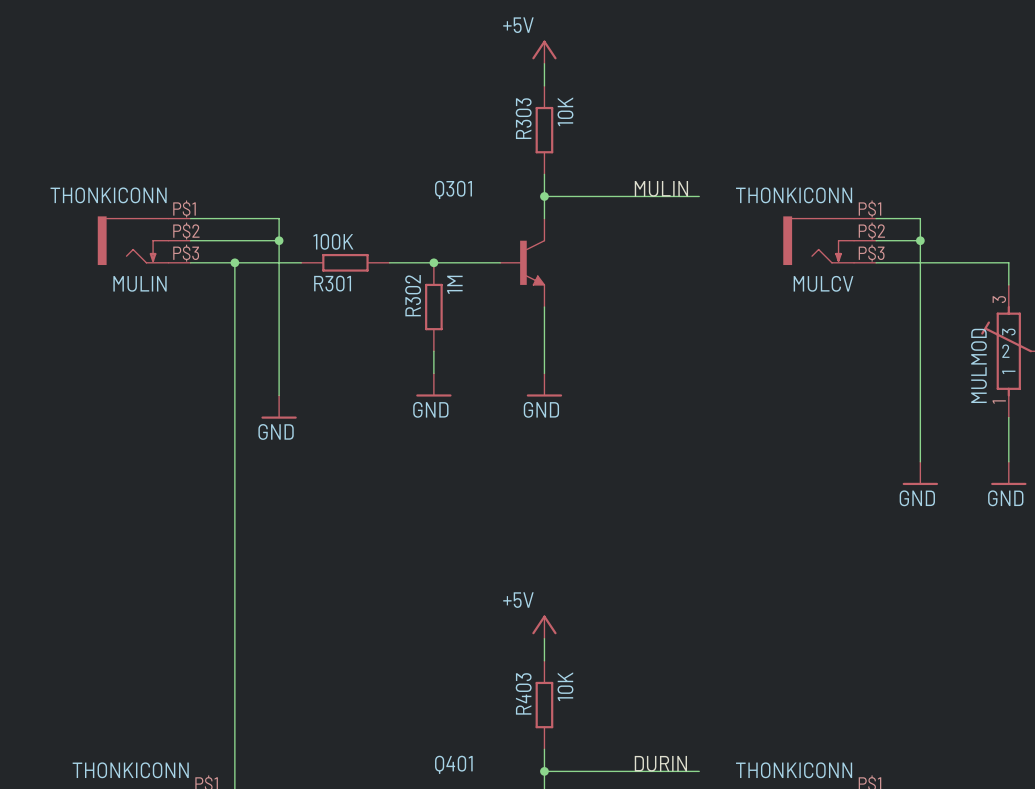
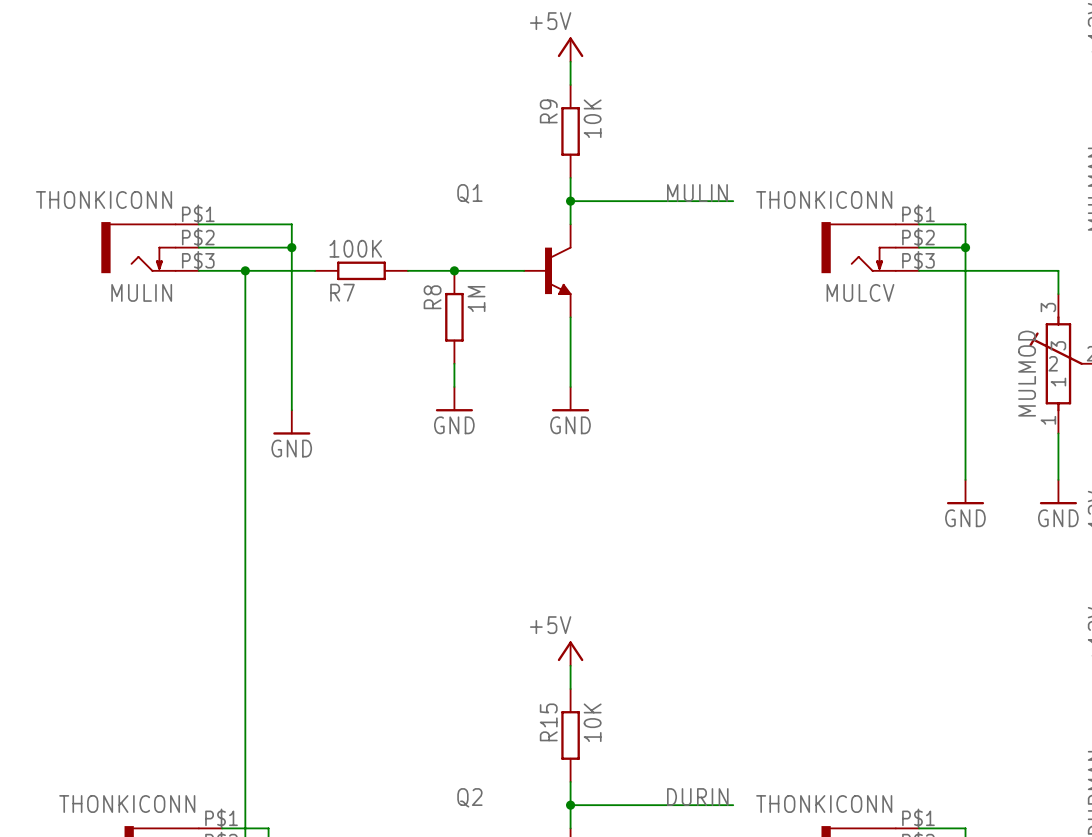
R303 name: R303 (523, 118) -> R9 (548, 111)
Q301 name: Q301 (453, 189) -> Q1 (469, 193)
R301 name: R301 (332, 283) -> R7 (342, 292)
R302 name: R302 (413, 295) -> R8 (432, 297)
R403 name: R403 (523, 693) -> R15 (548, 722)
Q401 name: Q401 (453, 764) -> Q2 (469, 797)

